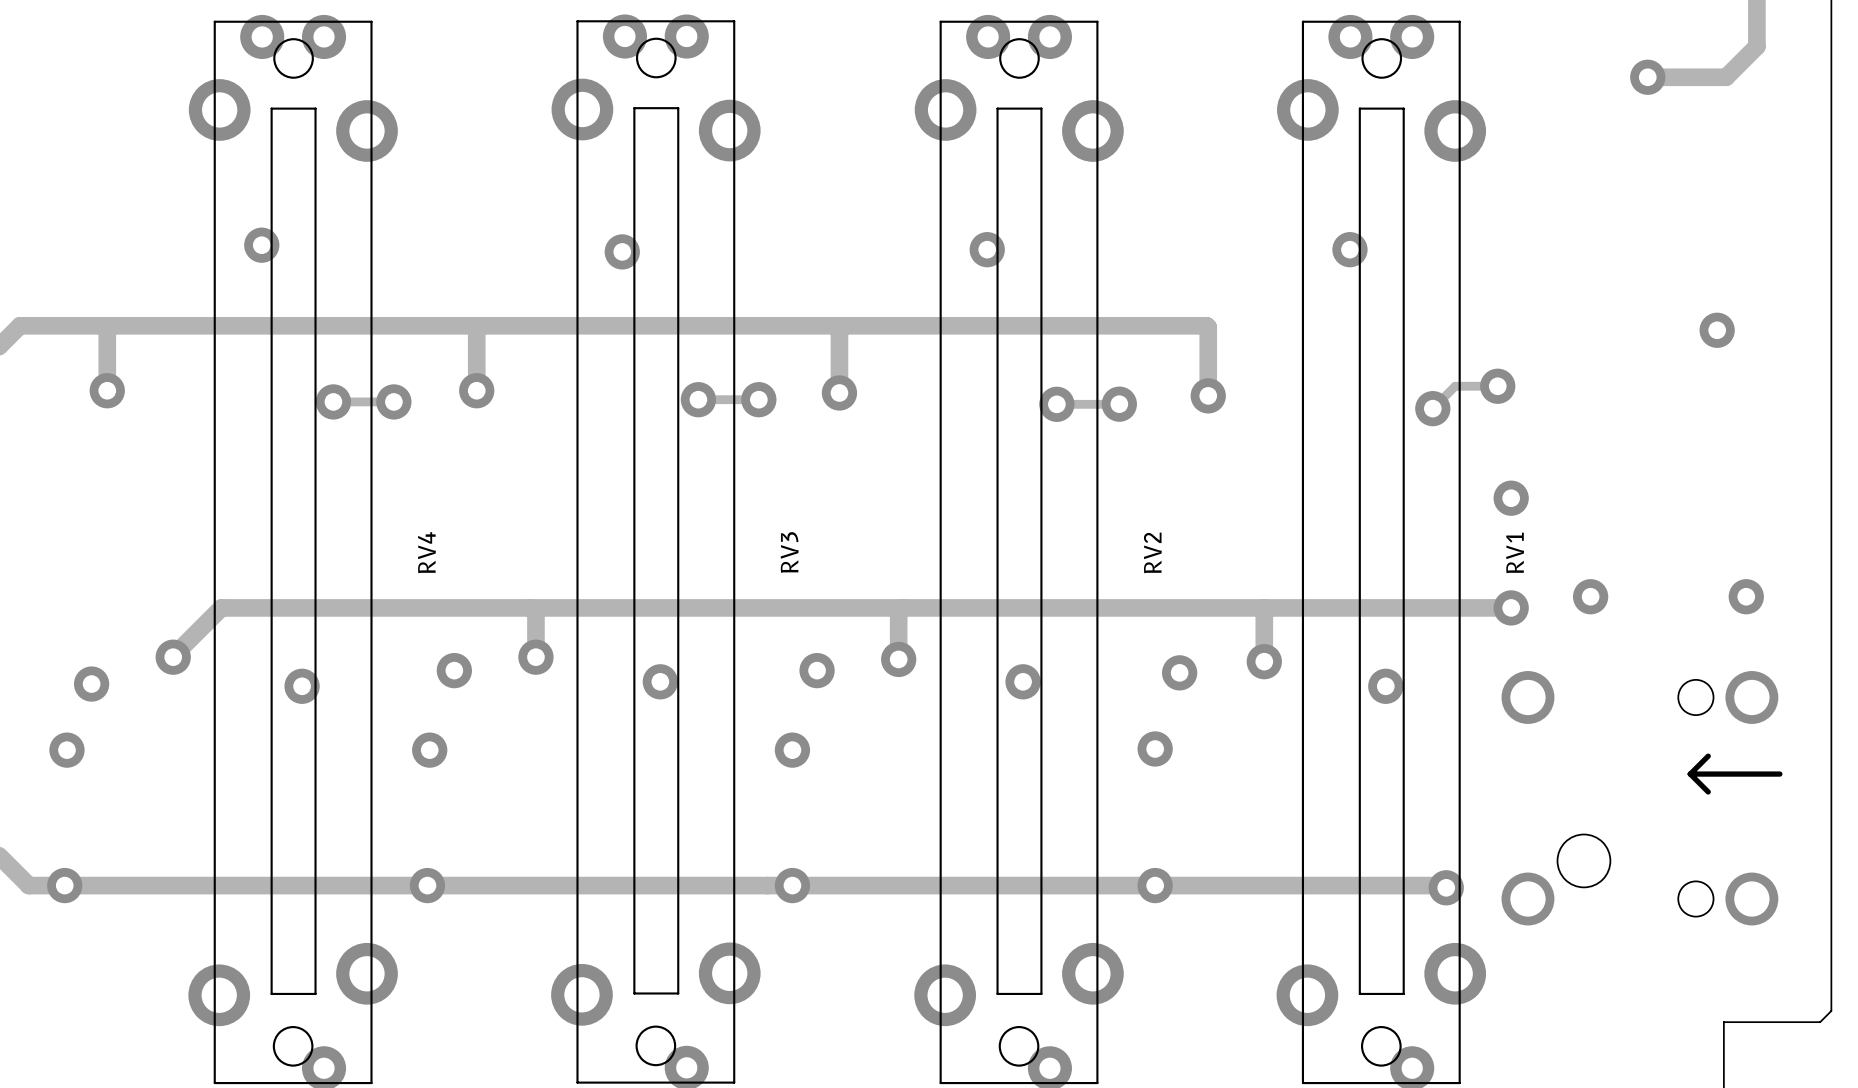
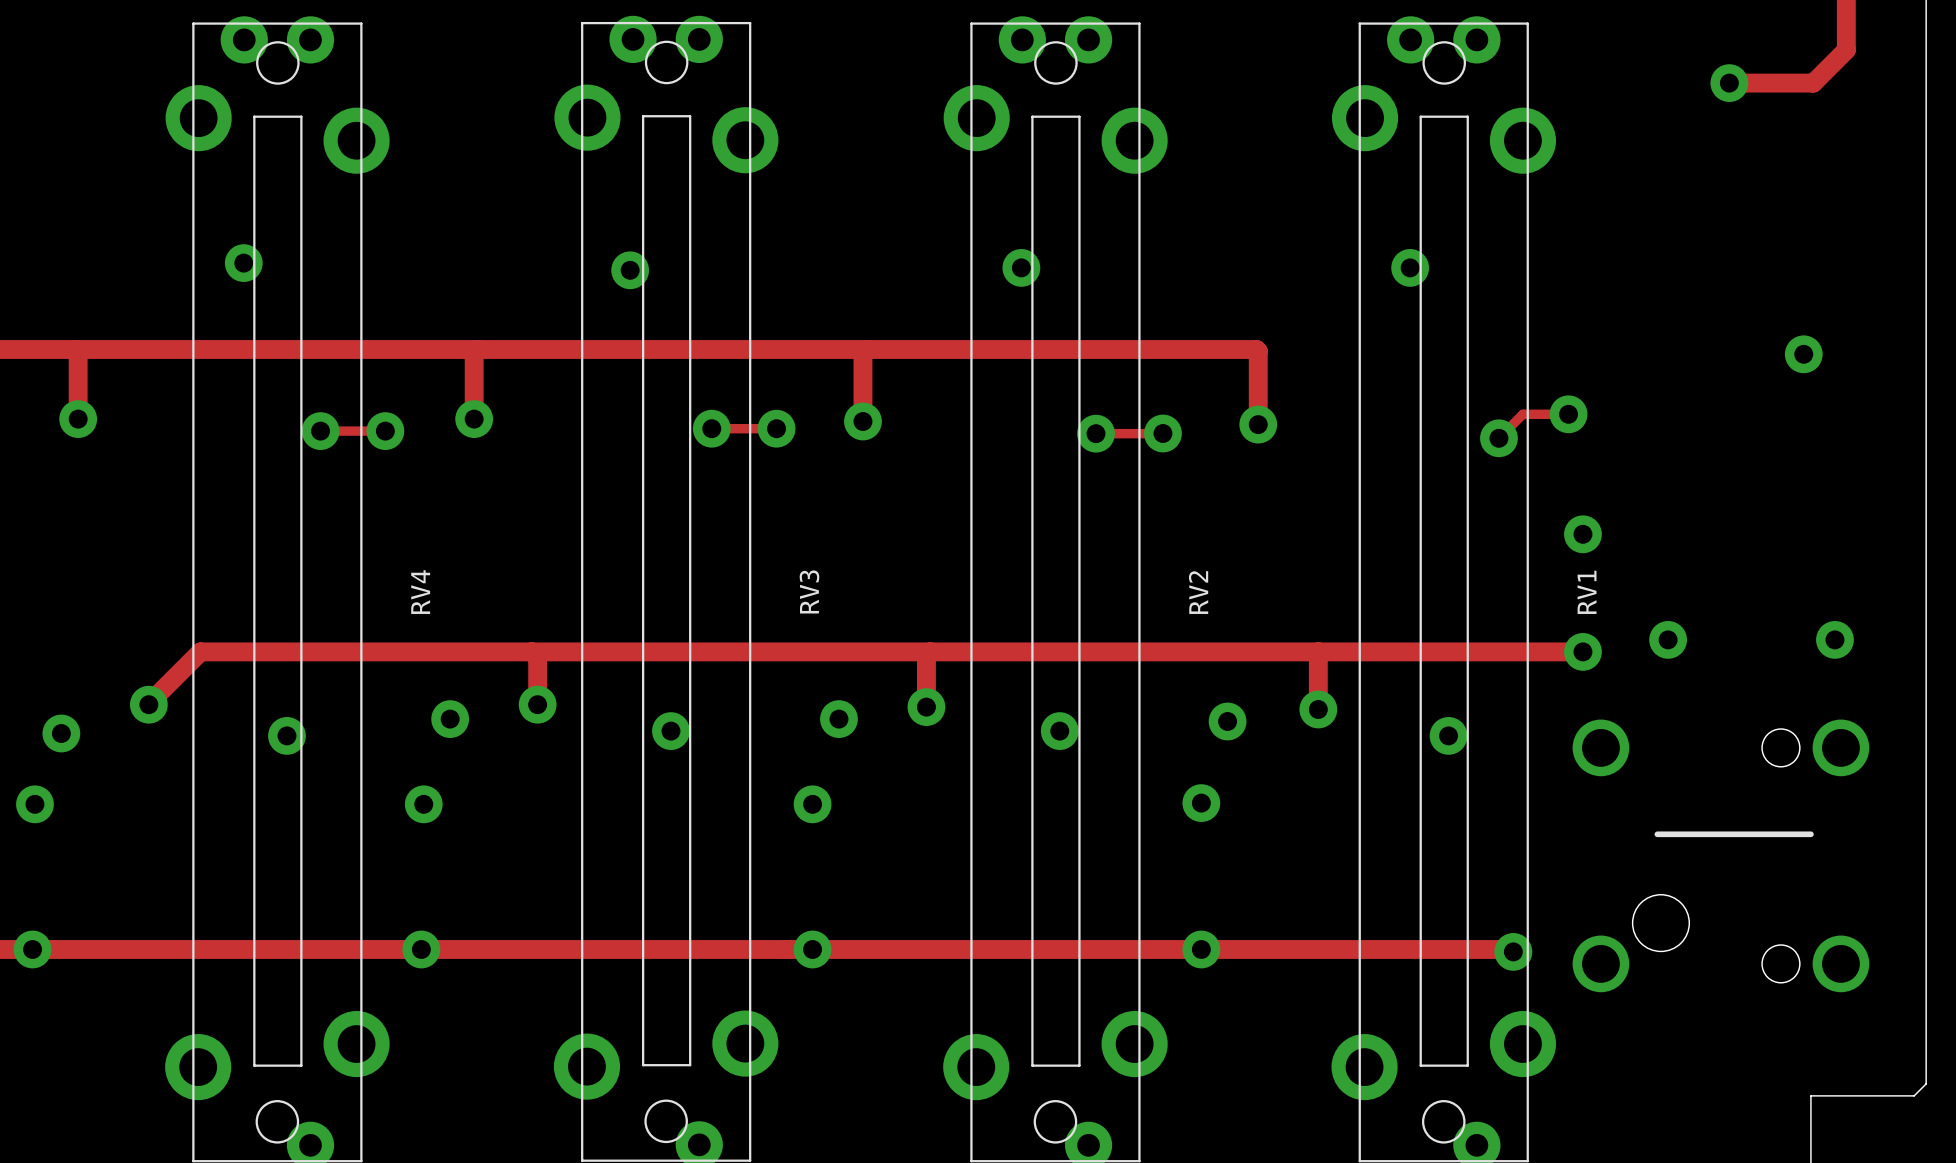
line: (1708, 756) (1690, 774) -> none
line: (1690, 774) (1708, 791) -> none
line: (1690, 774) (1779, 774) -> none
line: none -> (1657, 834) (1810, 834)

